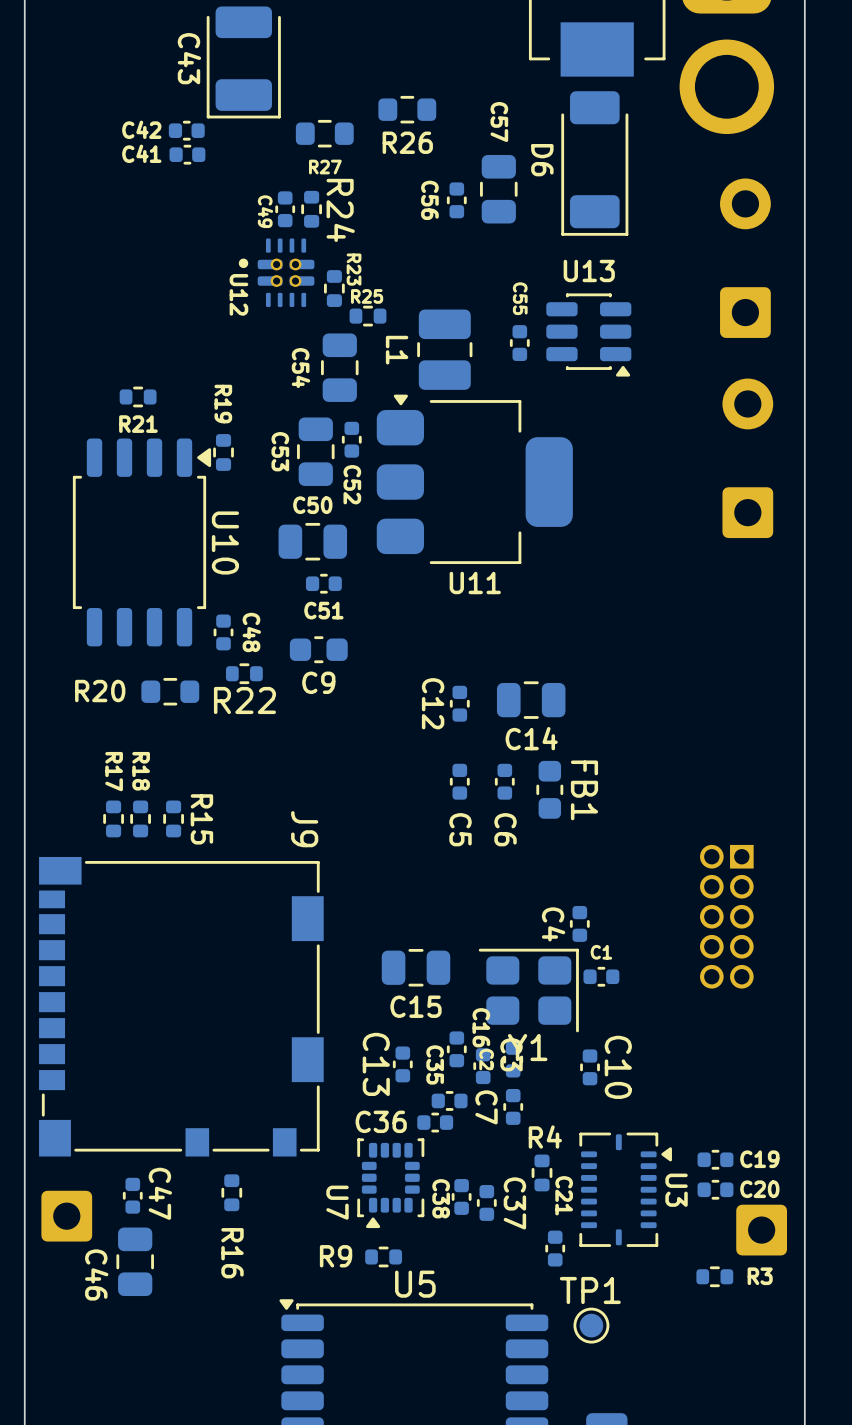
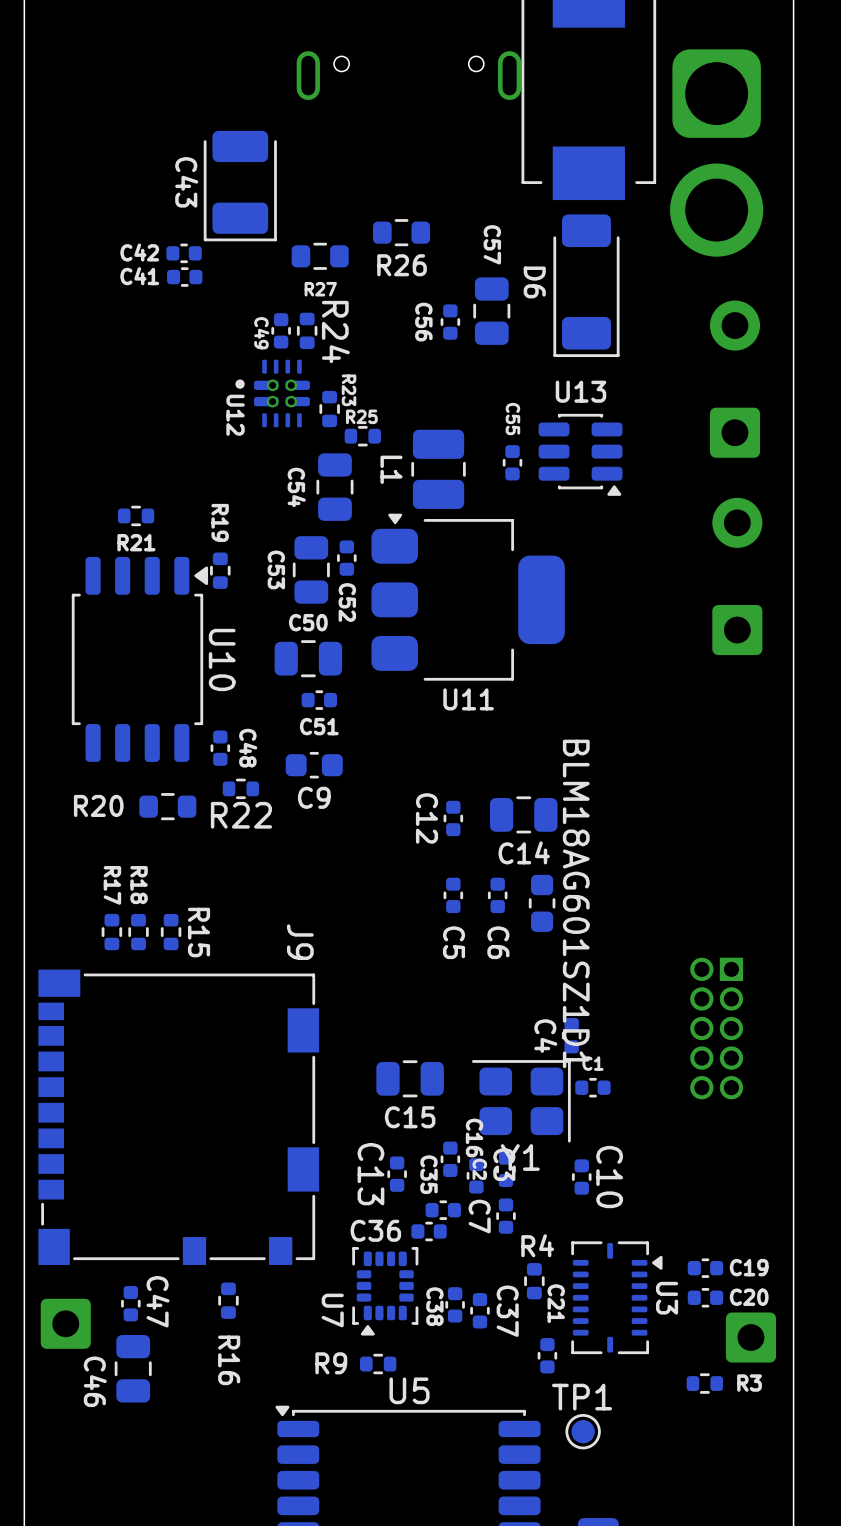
FB1 name: FB1 (584, 790) -> BLM18AG601SZ1D1 (576, 903)

